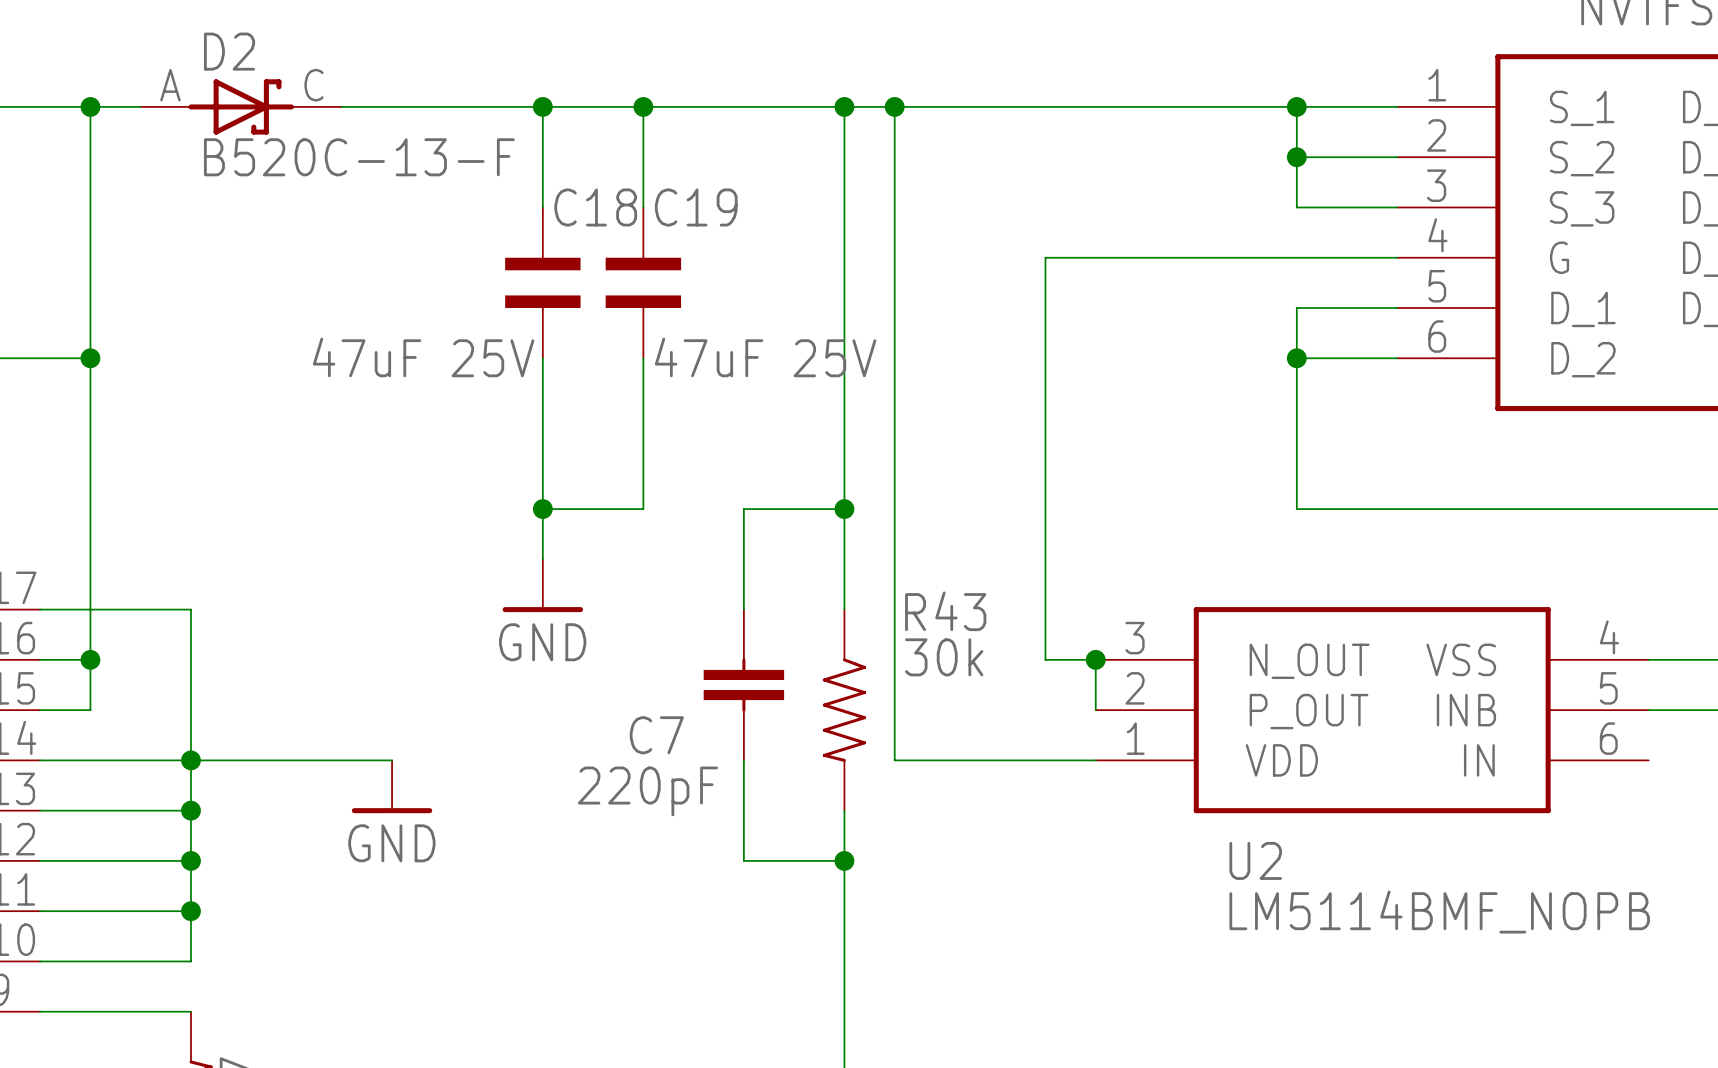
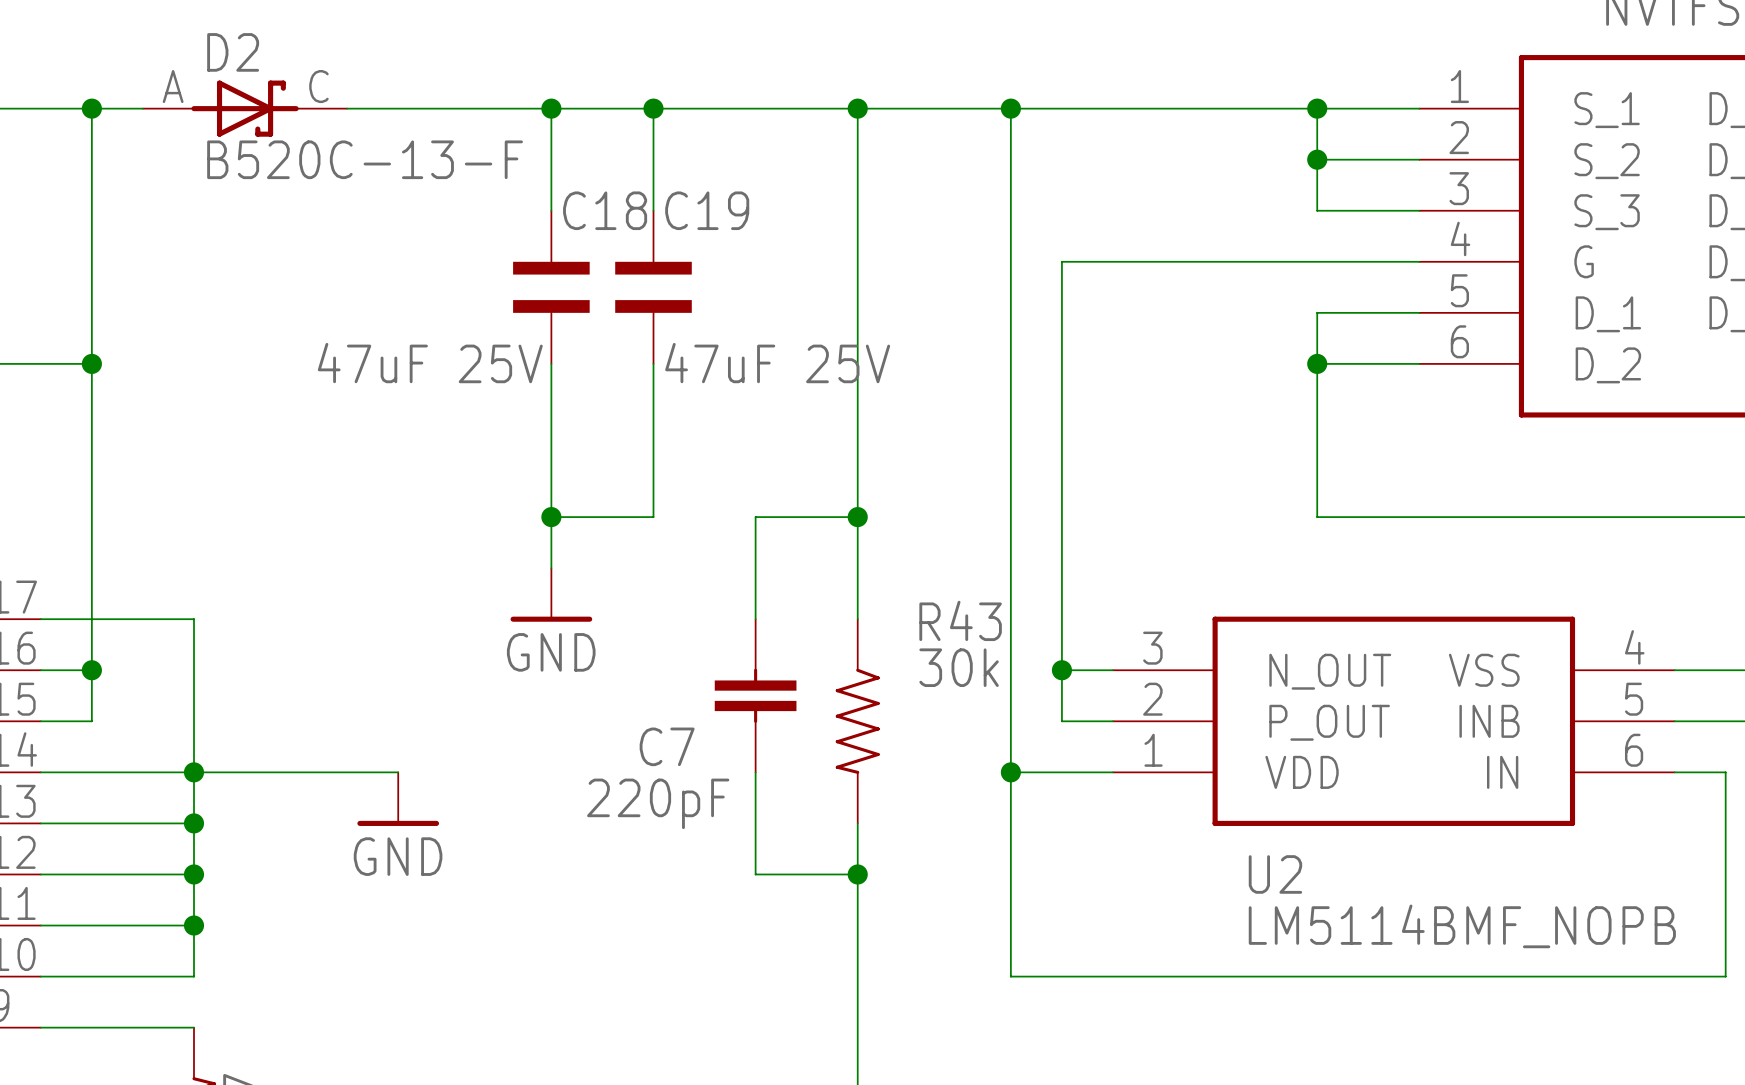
wire: (894, 106) (894, 760) (995, 760) -> none
junction position: (894, 106) -> (1010, 108)
wire: none -> (1010, 108) (1010, 976) (1725, 976) (1725, 772) (1674, 772)
wire: (1095, 659) (1095, 710) -> (1061, 670) (1061, 721) (1113, 721)
junction position: (1095, 659) -> (1061, 670)
junction: none -> (1010, 772)

